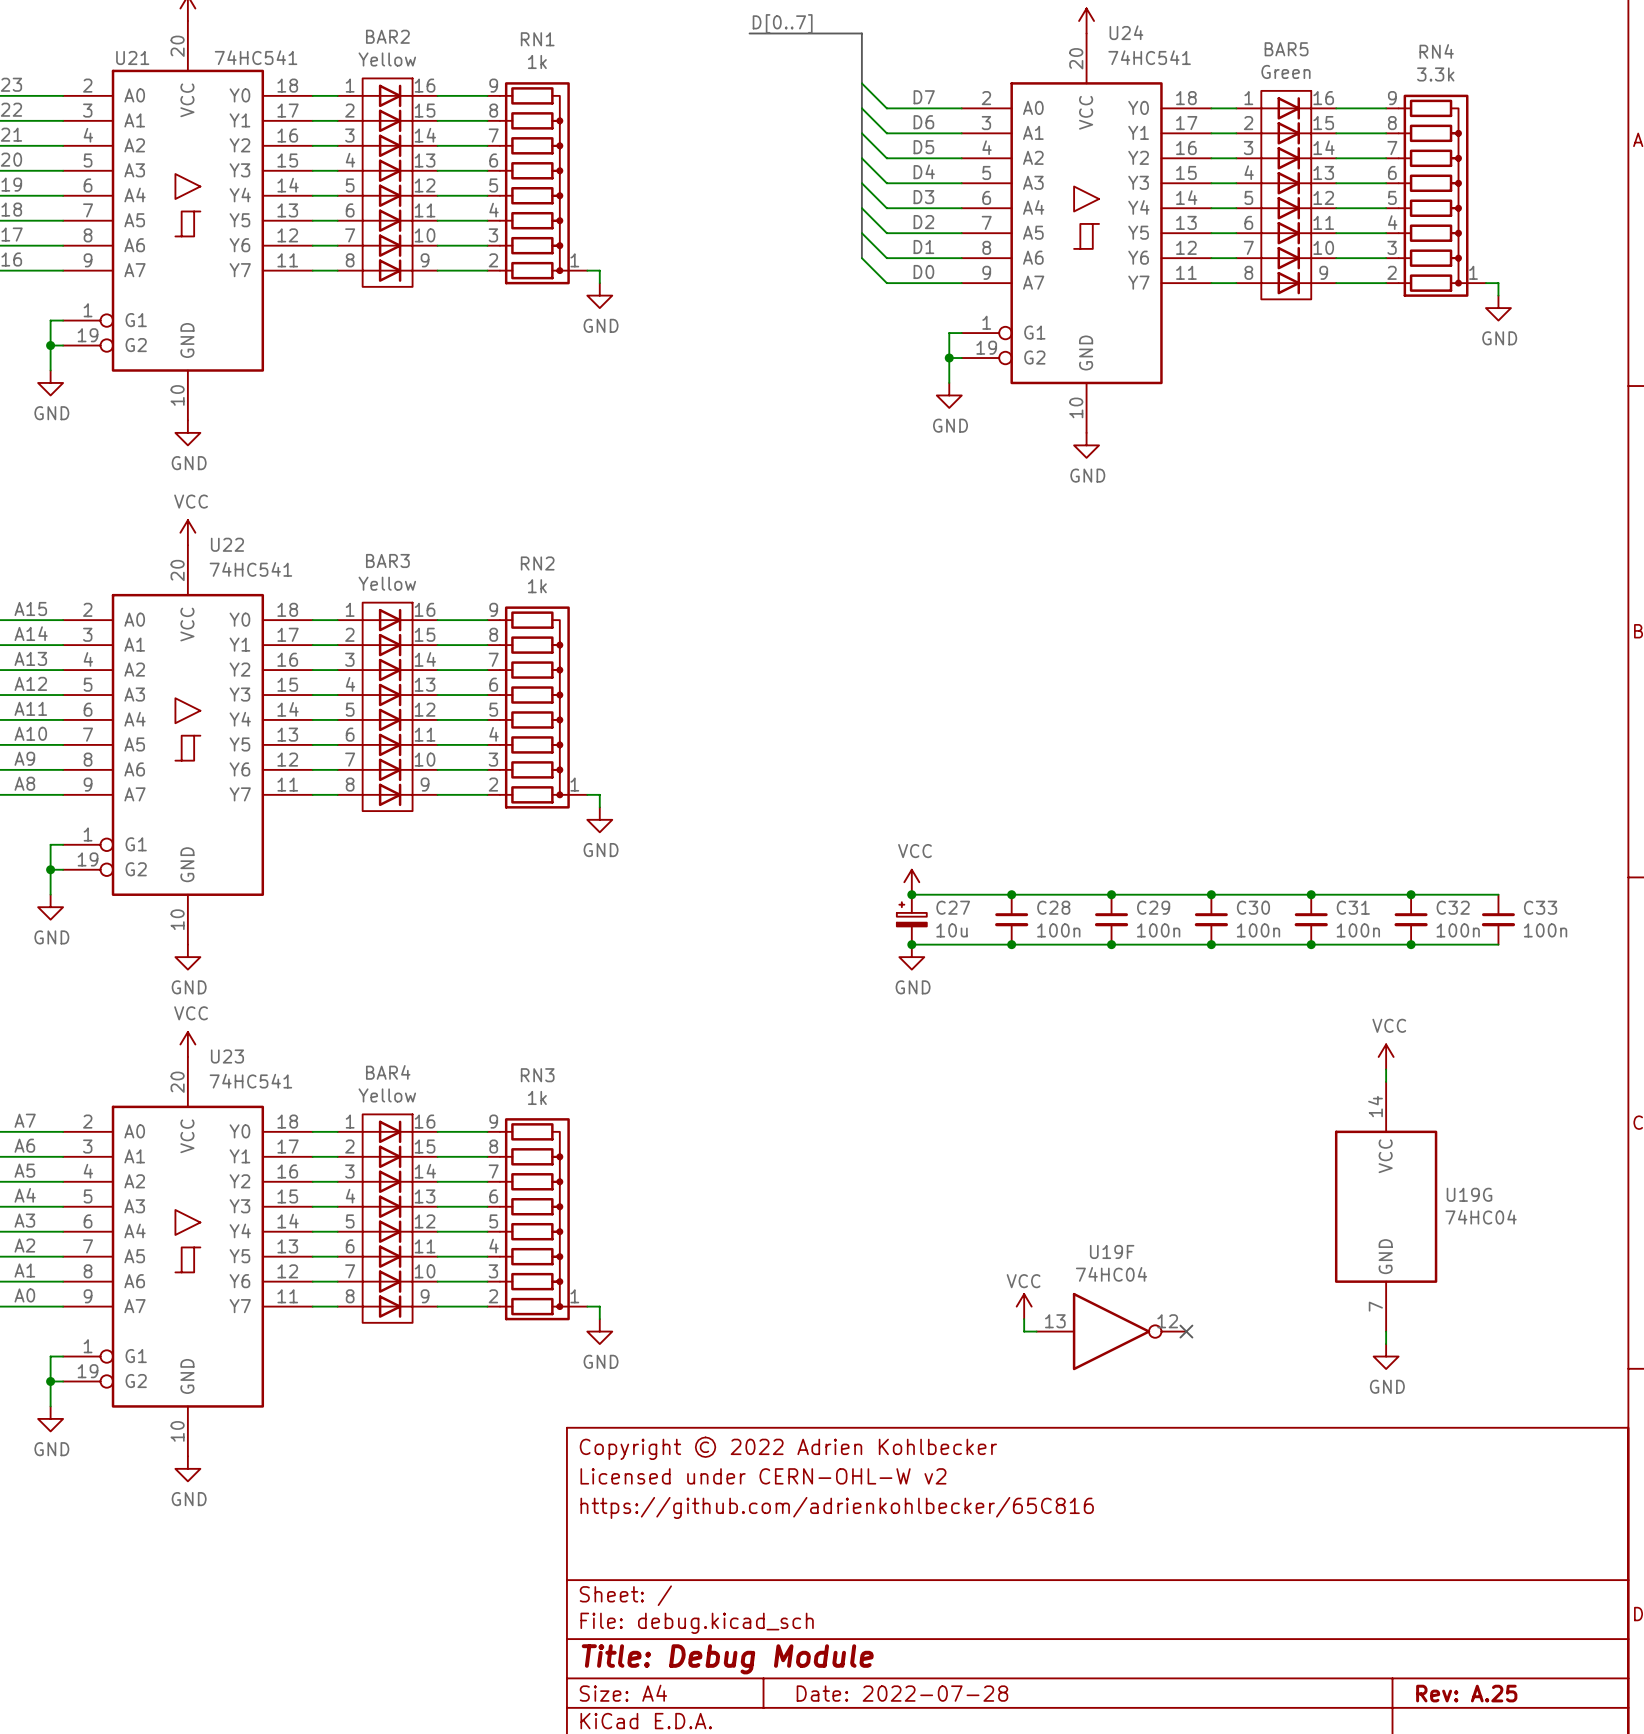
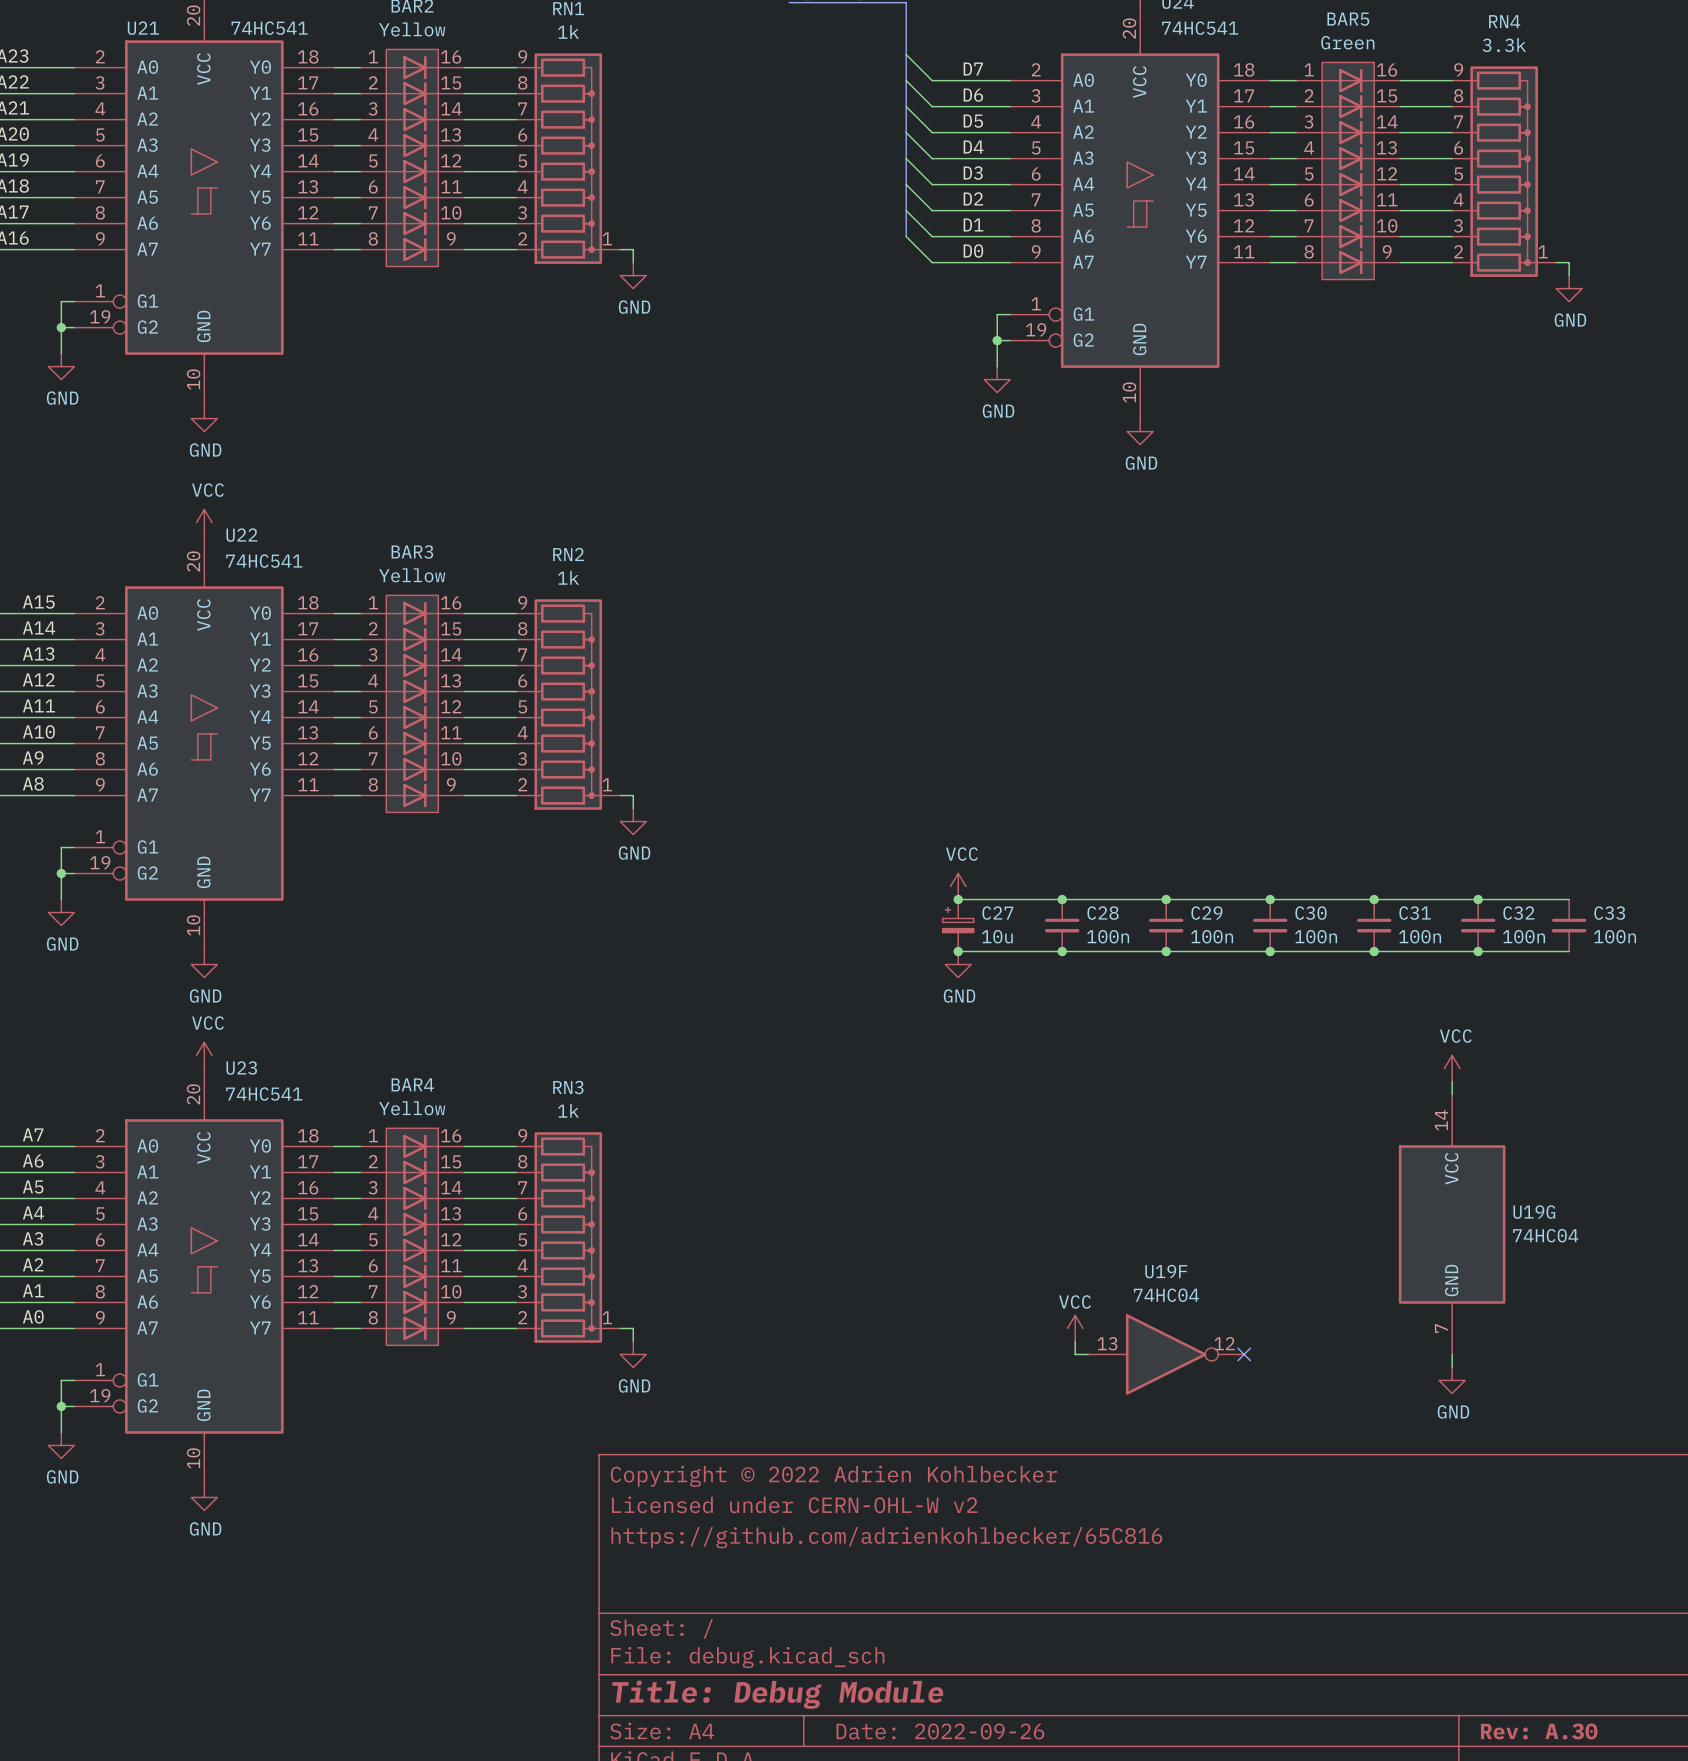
title block: Date: 2022-07-28 (902, 1693) -> Date: 2022-09-26 (940, 1731)
title block: Rev: A.25 (1466, 1693) -> Rev: A.30 (1539, 1731)

